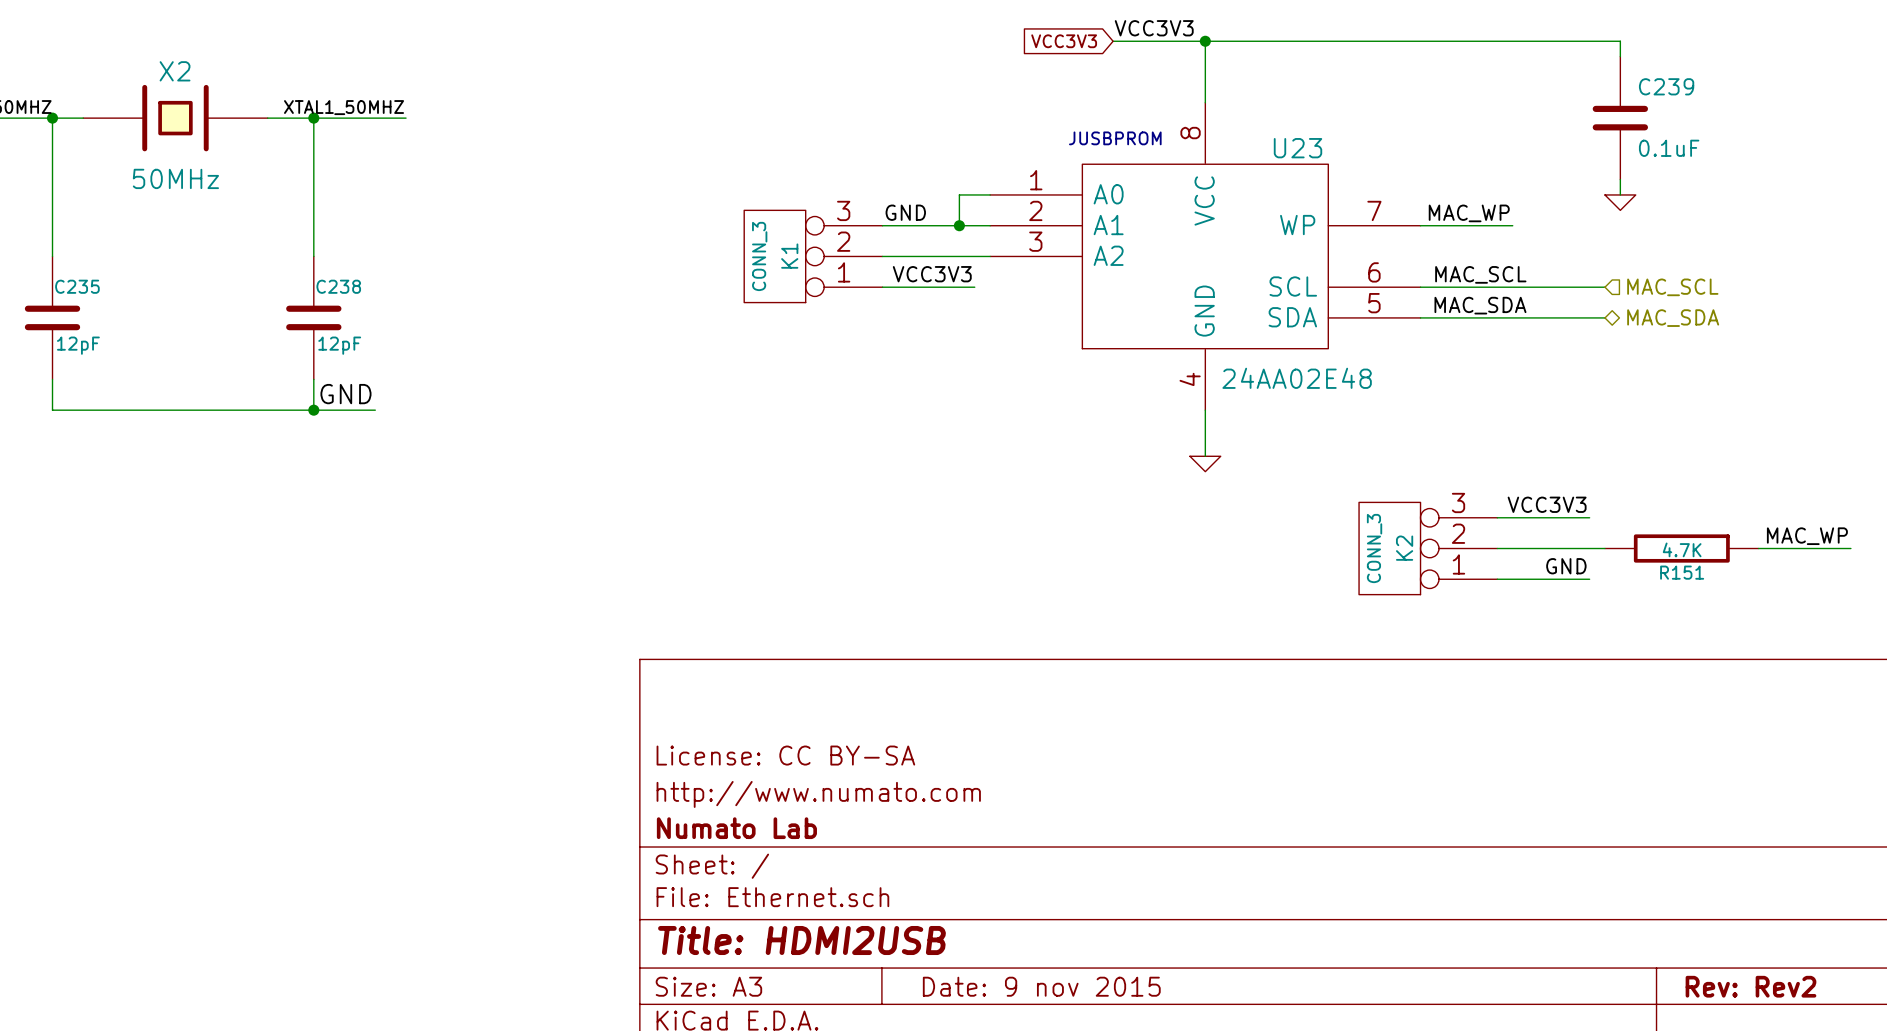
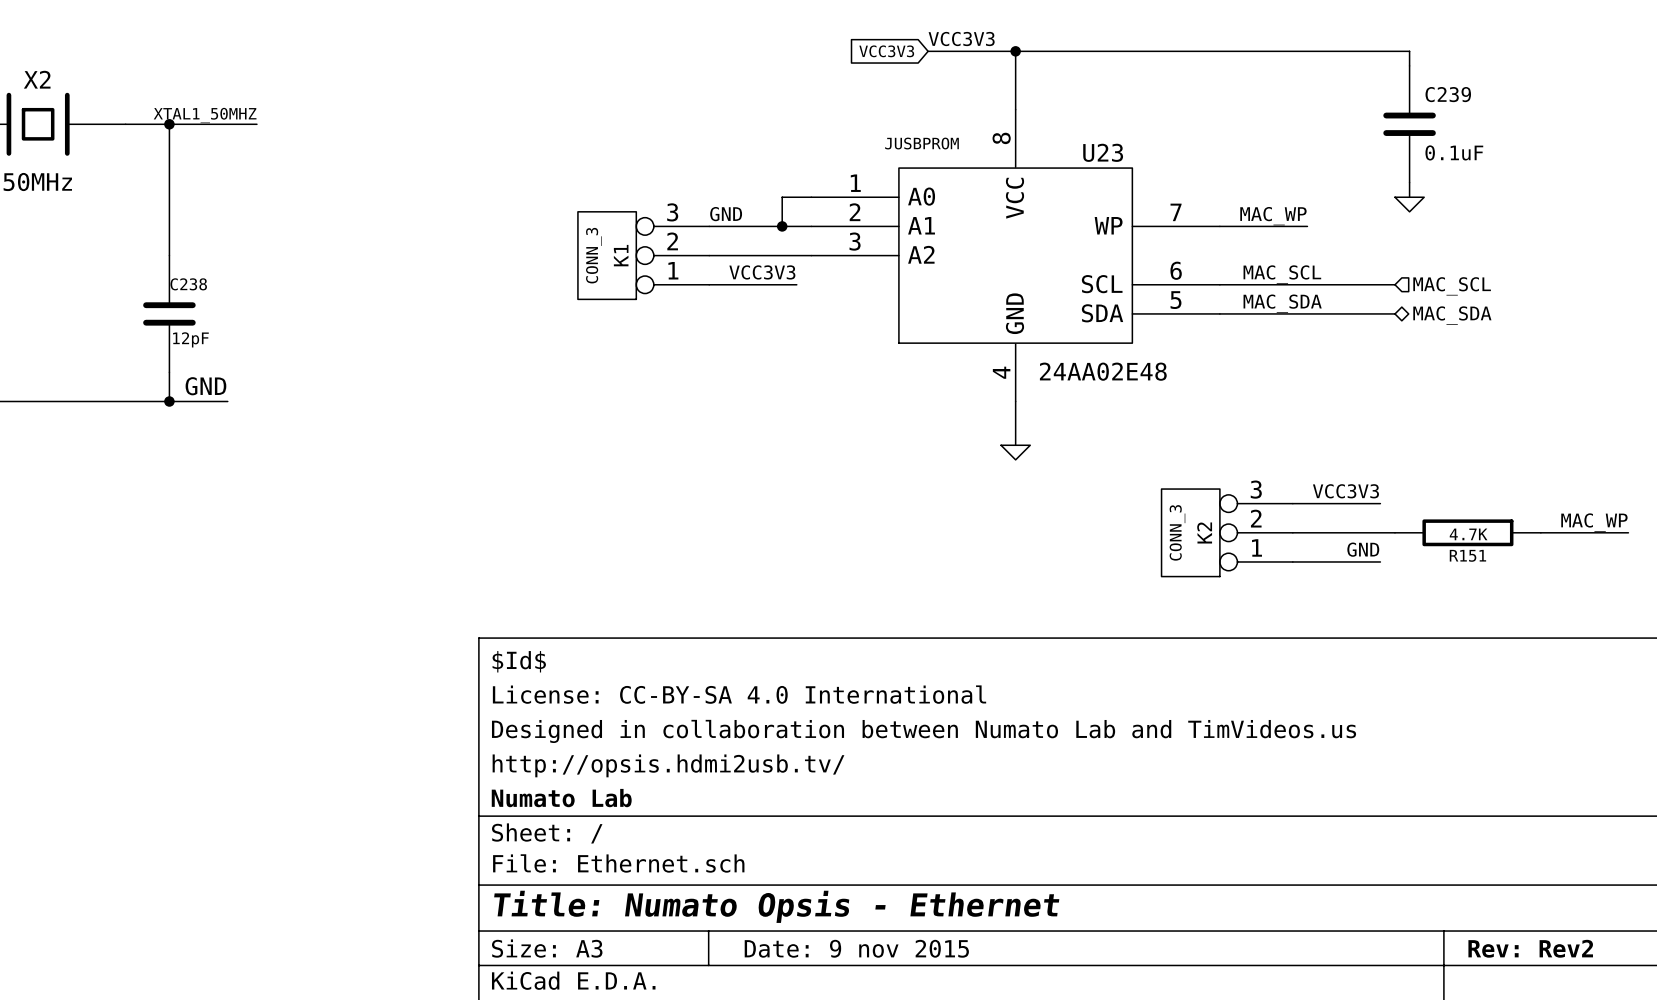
title block: none -> $Id$ (519, 661)
title block: none -> License: CC-BY-SA 4.0 International (739, 694)
title block: License: CC BY-SA (785, 755) -> Designed in collaboration between Numato Lab and TimVideos.us (924, 731)
title block: http://www.numato.com (818, 794) -> http://opsis.hdmi2usb.tv/ (668, 765)
title block: Title: HDMI2USB (801, 940) -> Title: Numato Opsis - Ethernet (776, 906)

